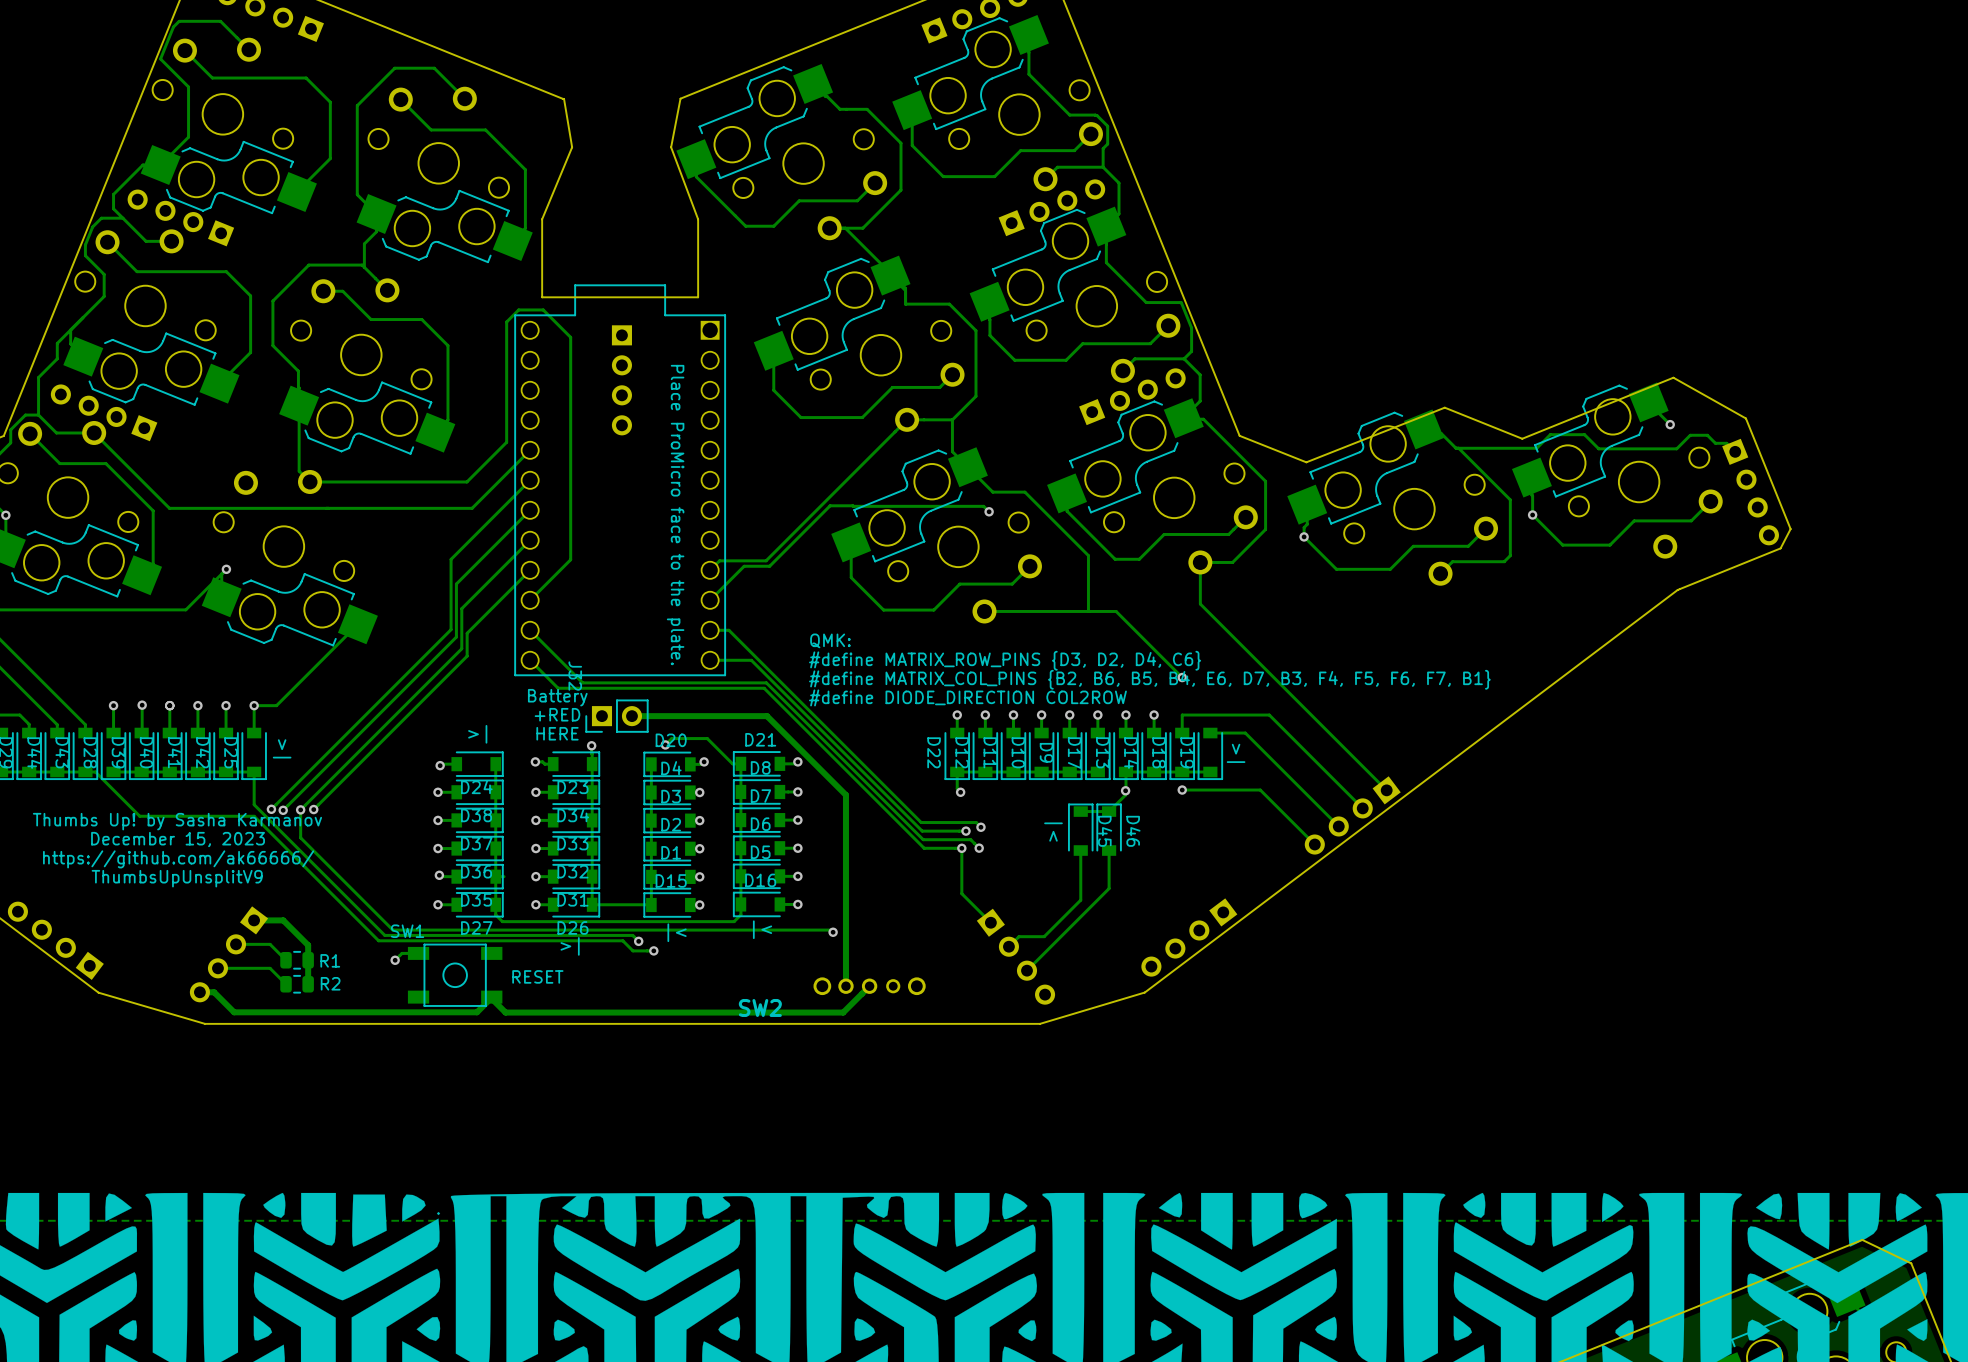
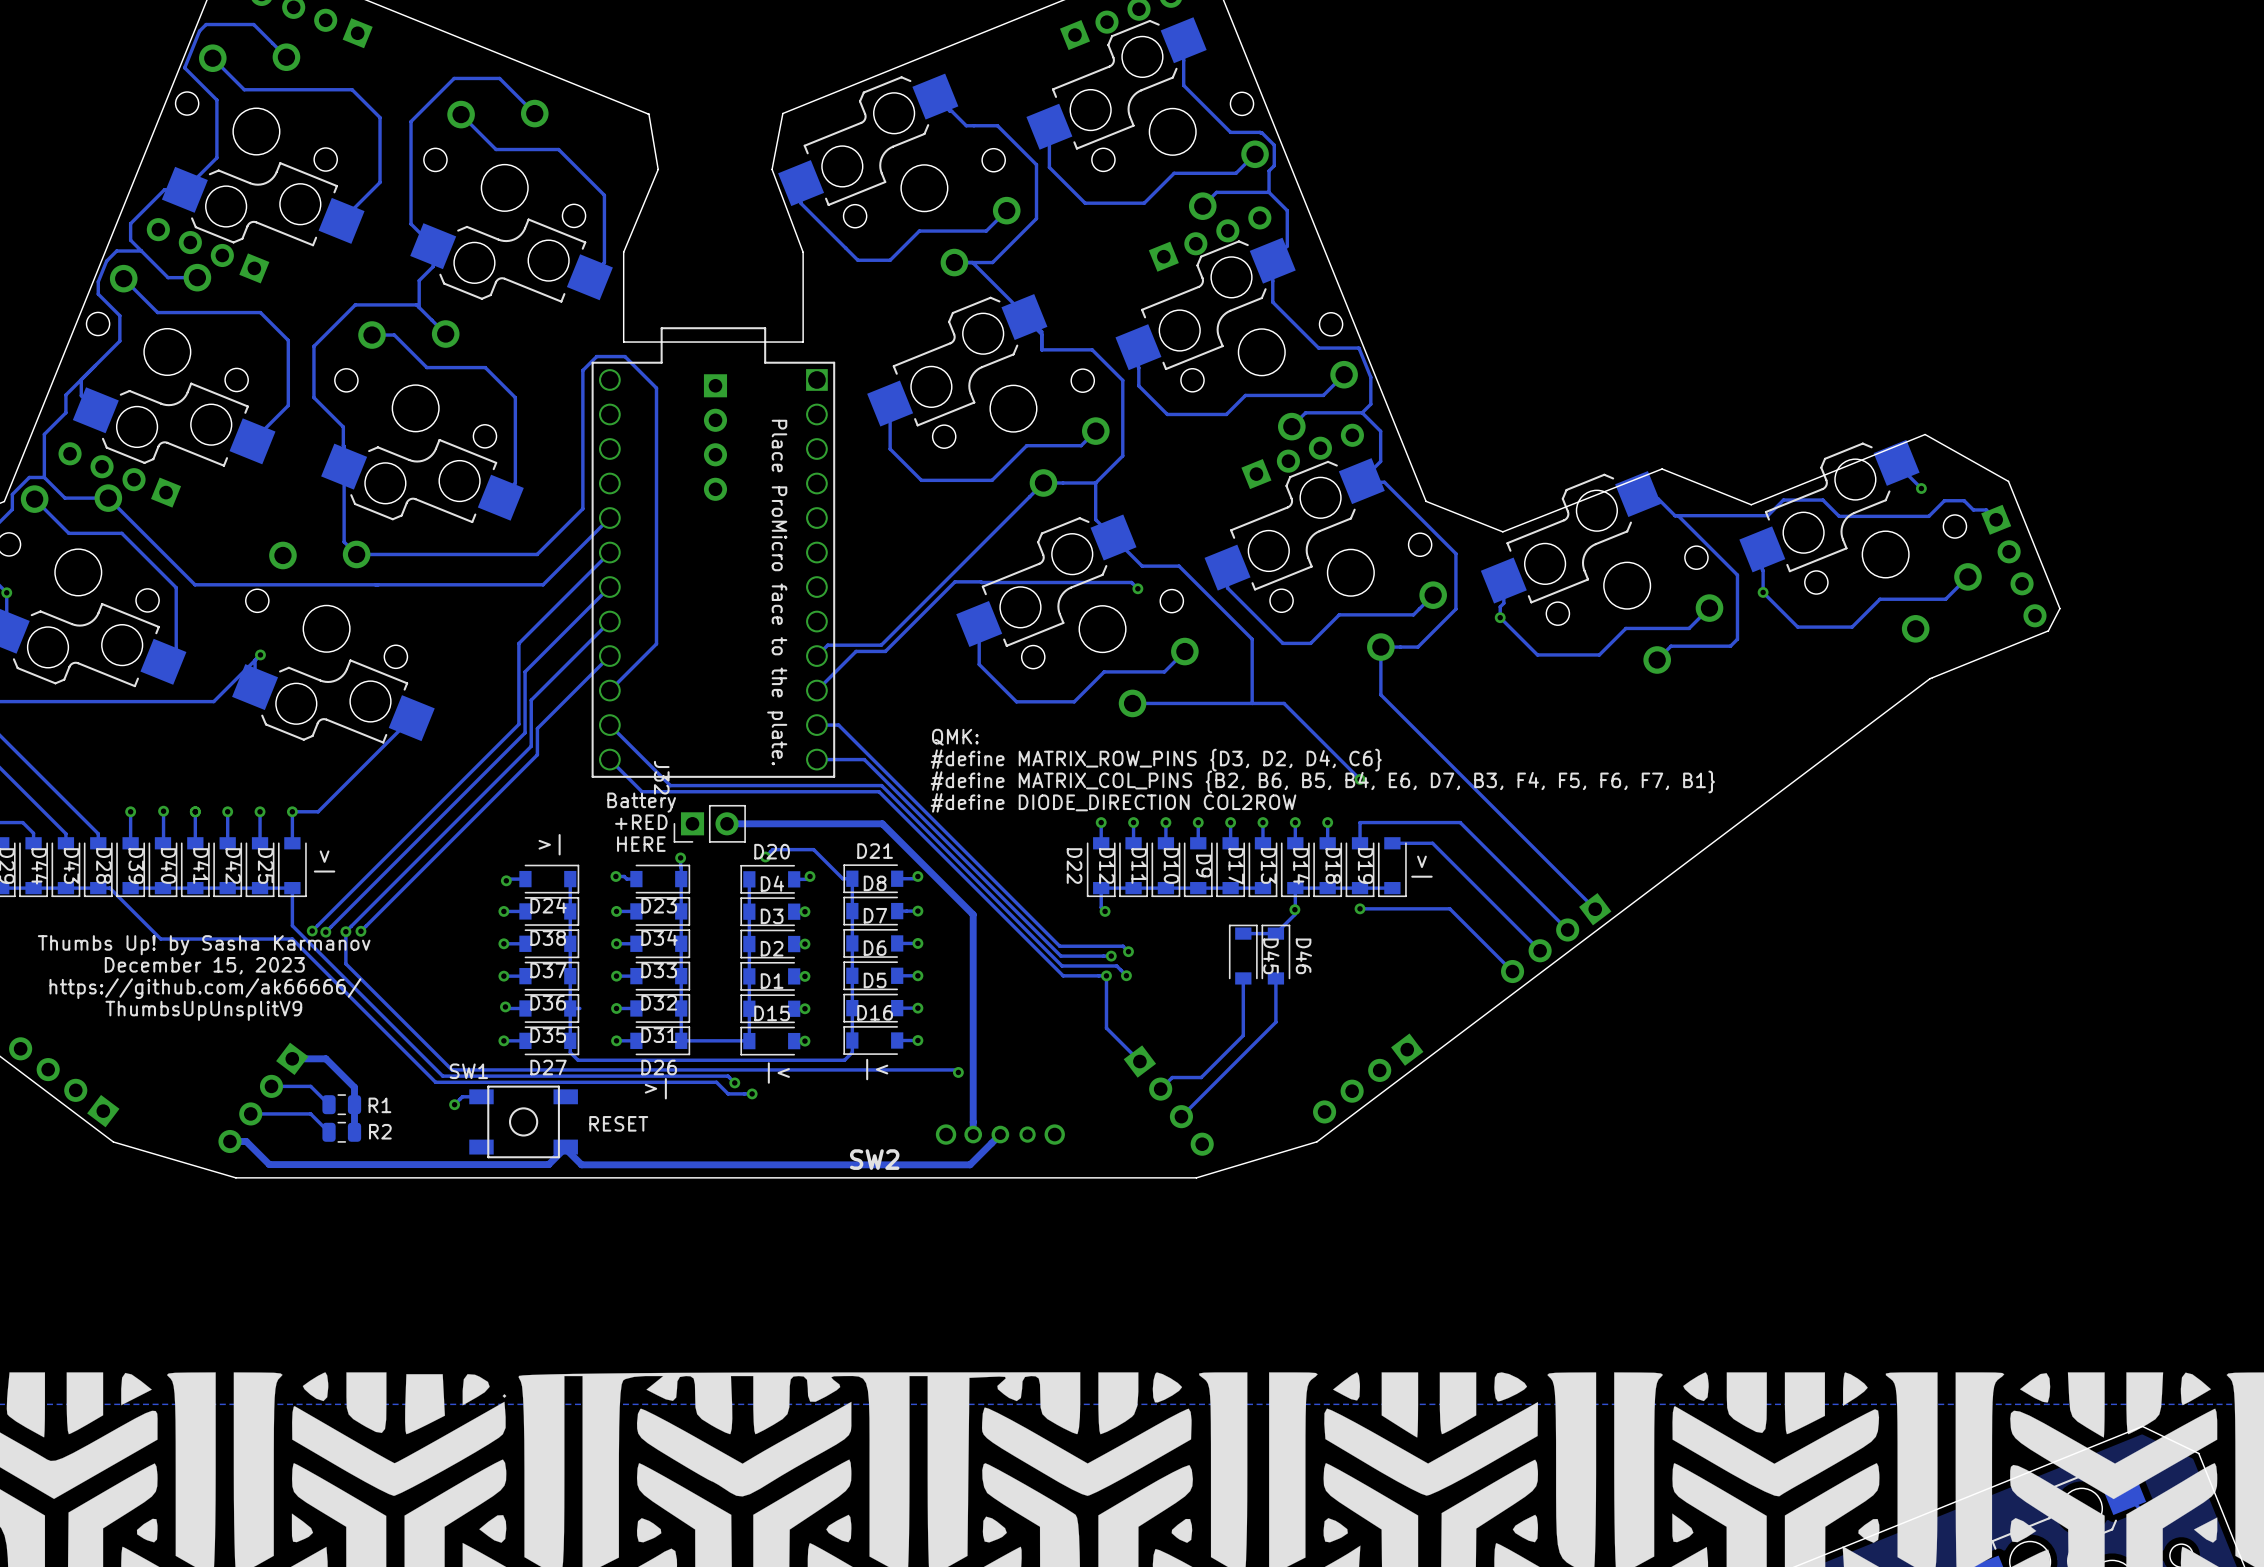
text: |< (1053, 832) -> none

